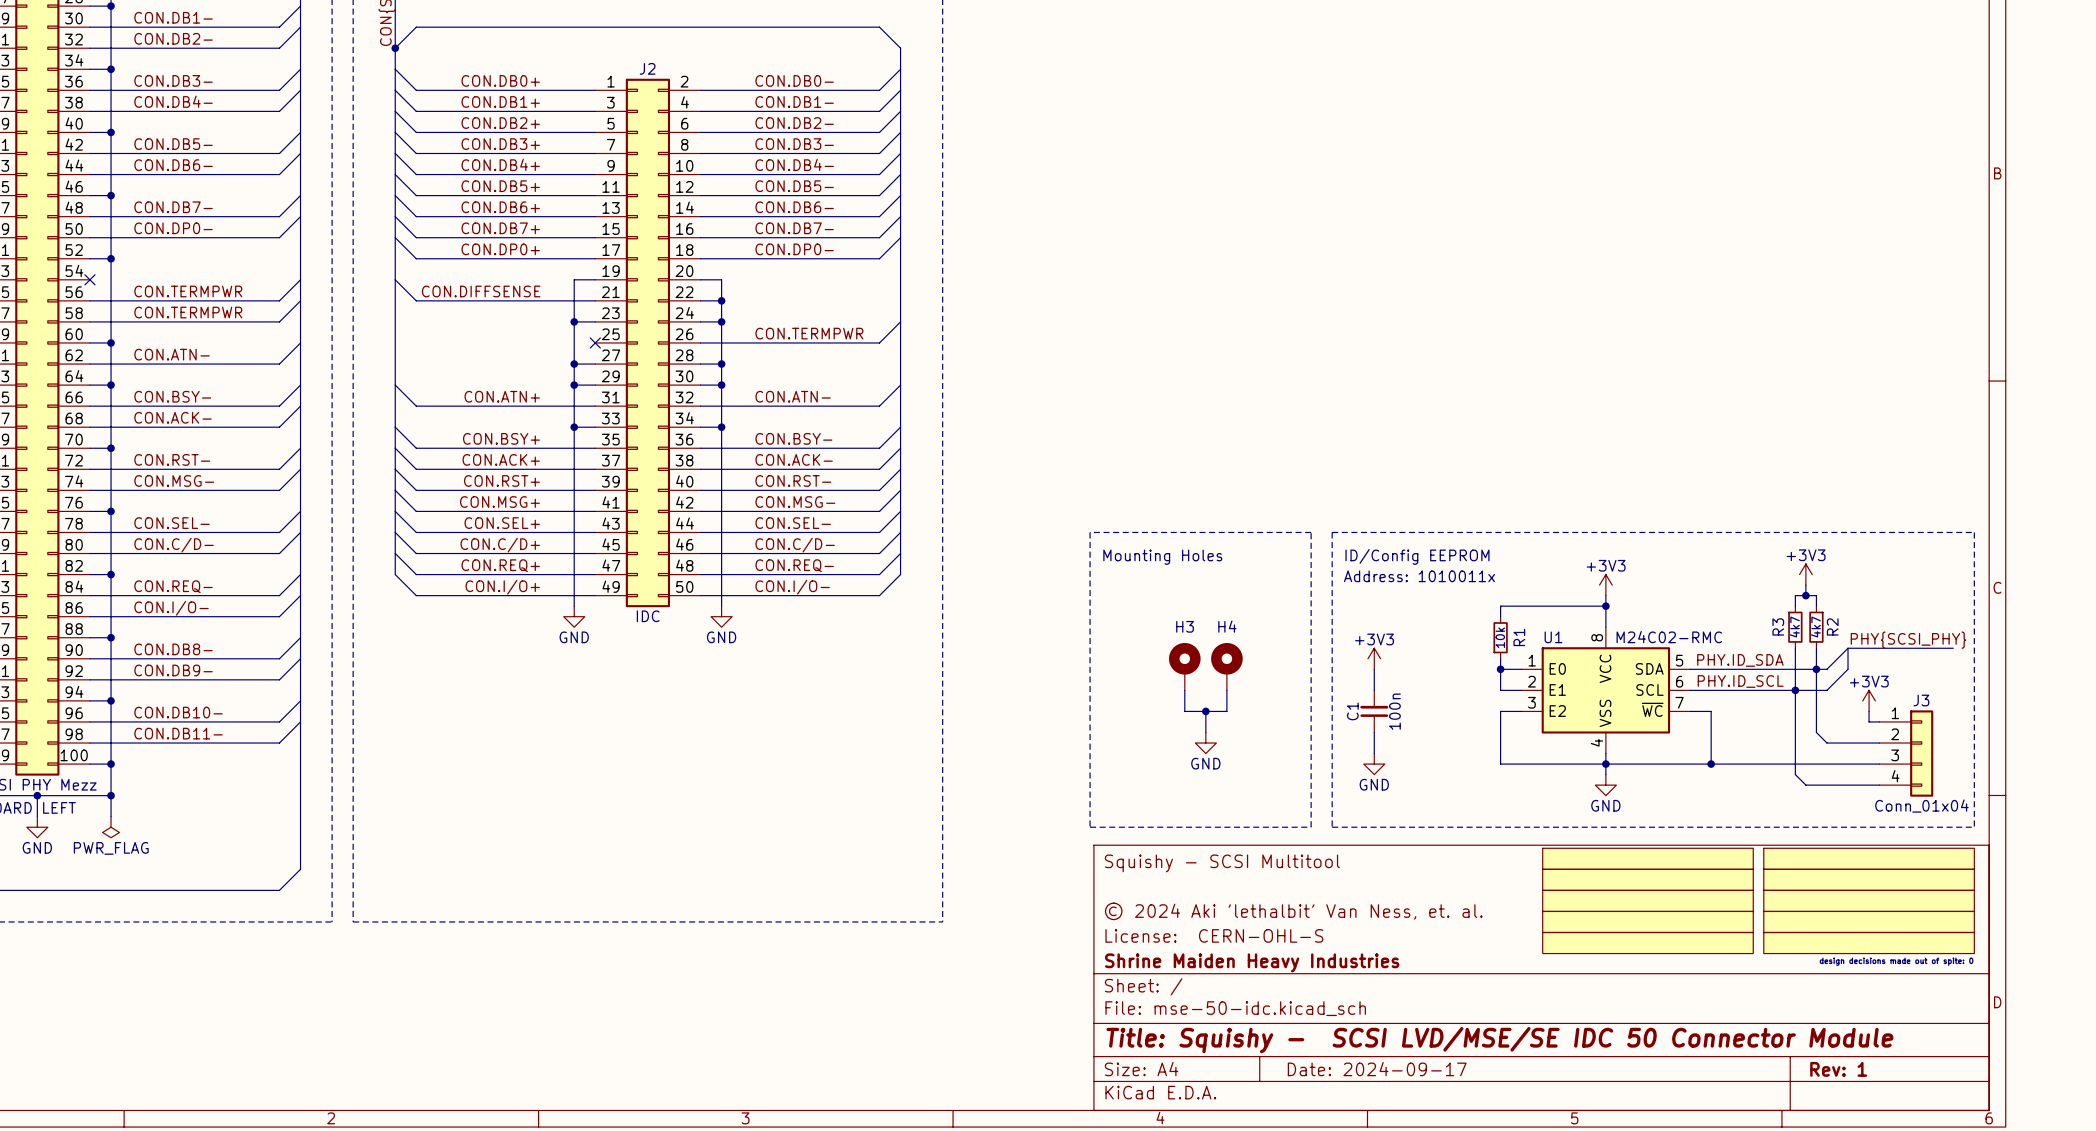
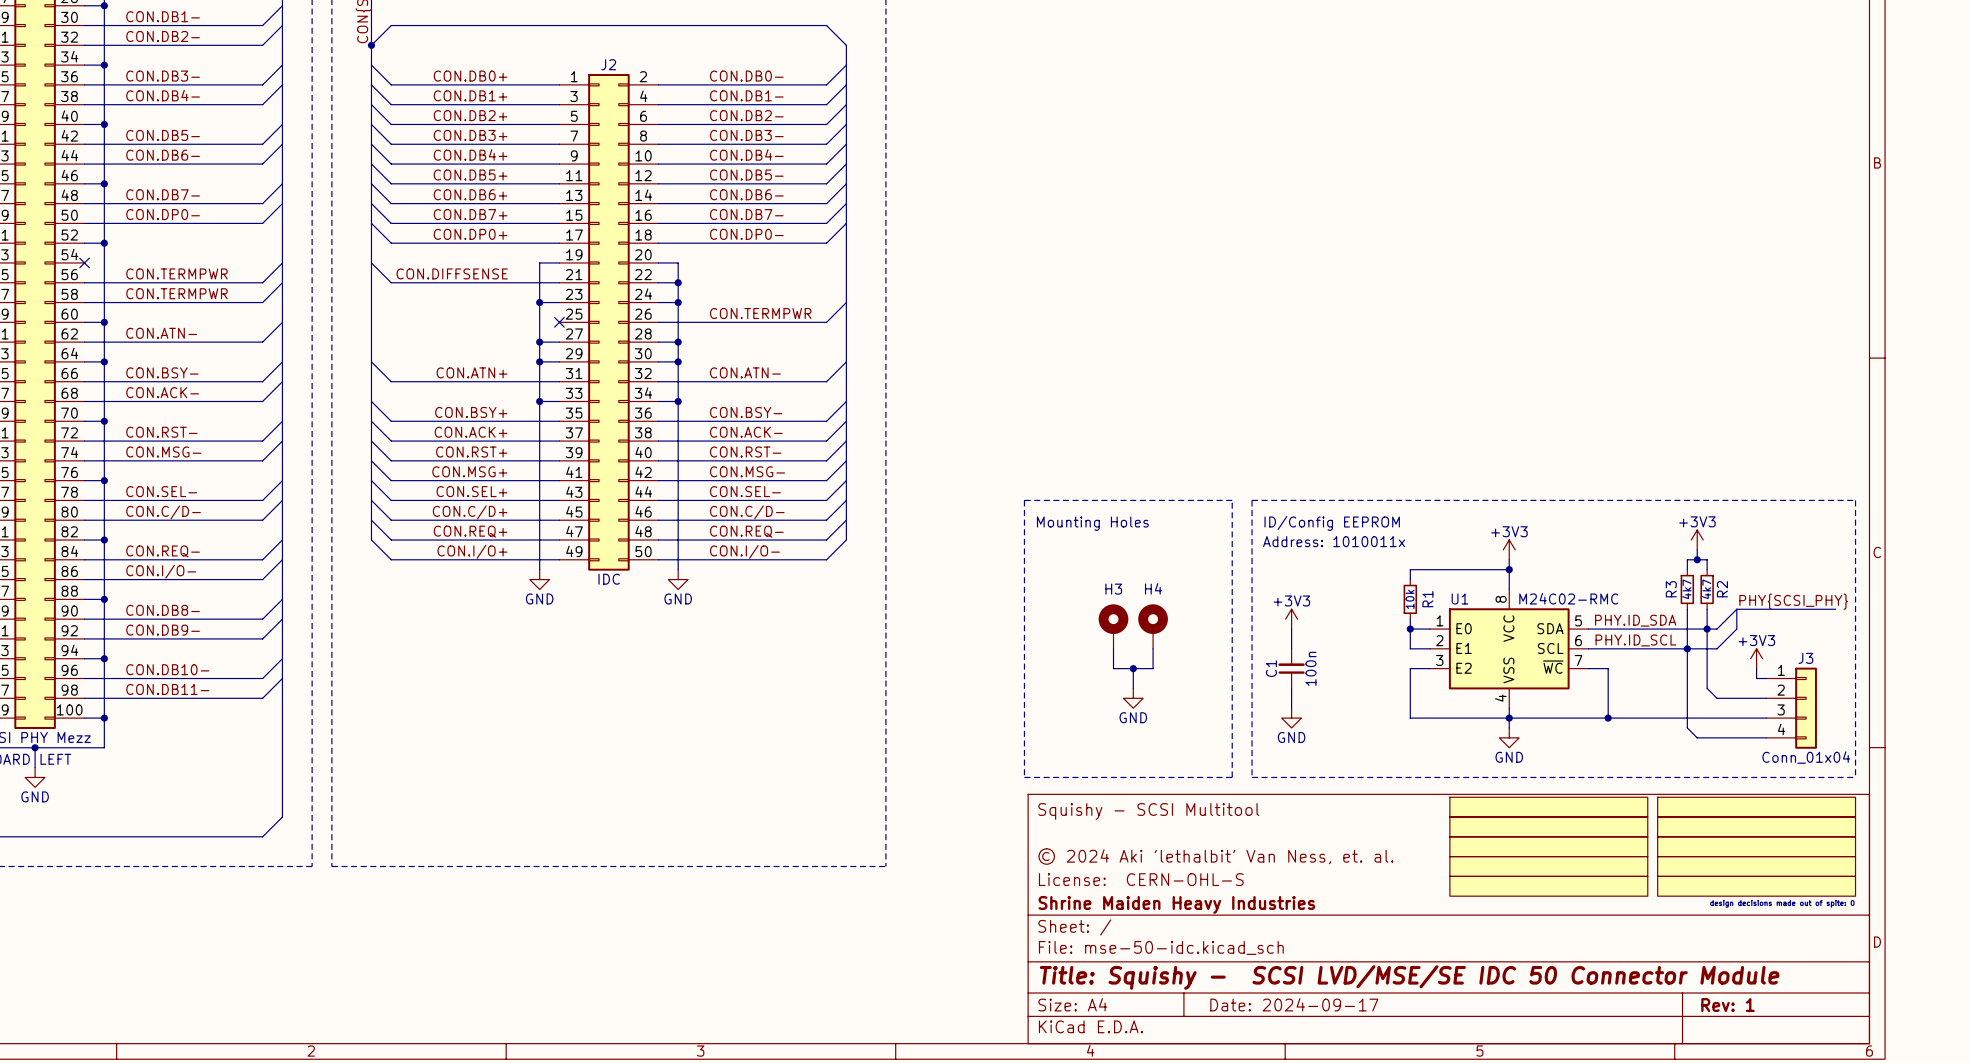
wire: (111, 795) (111, 816) -> none
junction: (111, 795) -> none
power symbol: PWR_FLAG (111, 827) -> none

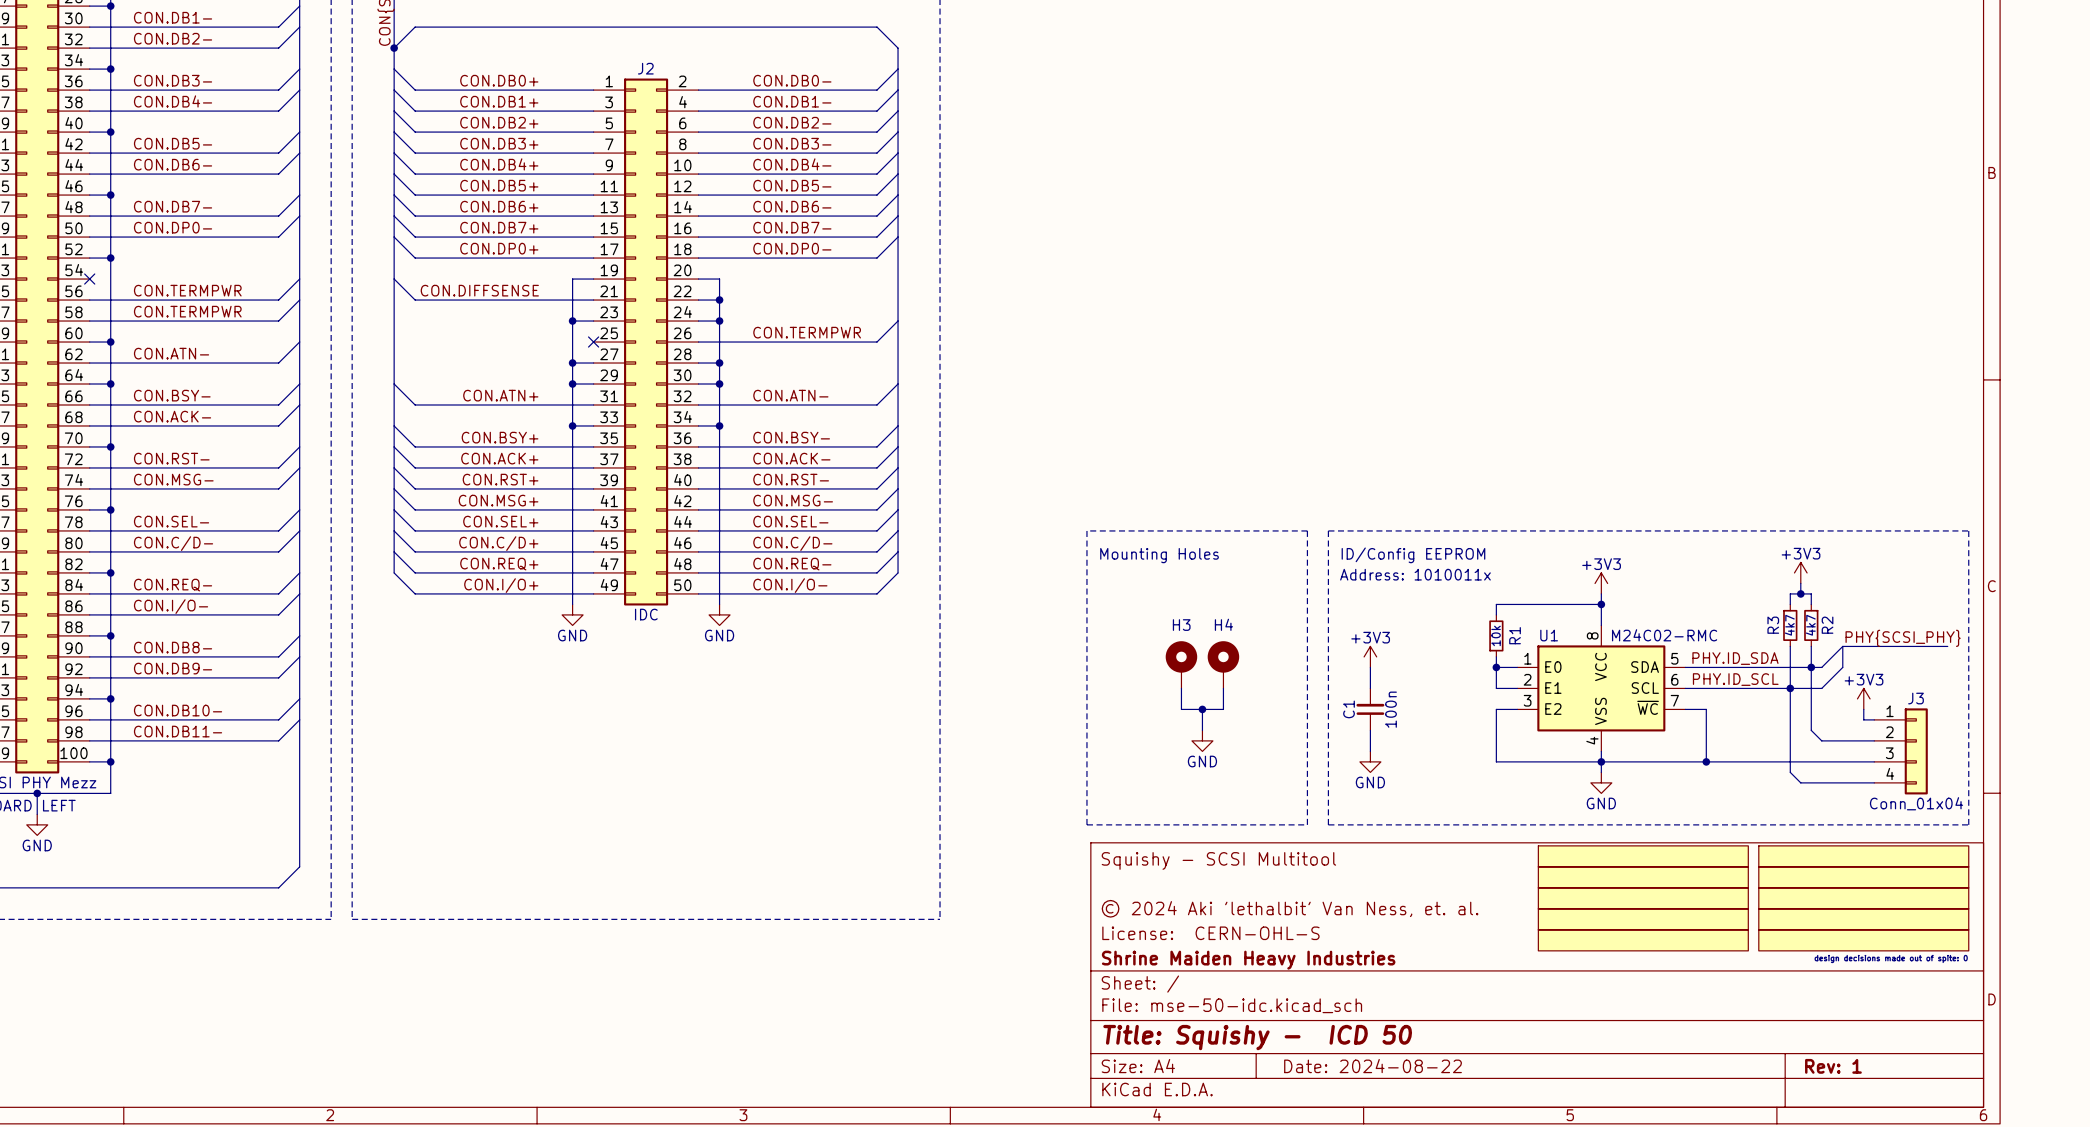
title block: Title: Squishy - SCSI LVD/MSE/SE IDC 50 Connector Module (1409, 977) -> Title: Squishy - ICD 50 (1257, 1037)
title block: Date: 2024-09-17 (1294, 1004) -> Date: 2024-08-22 (1373, 1066)

